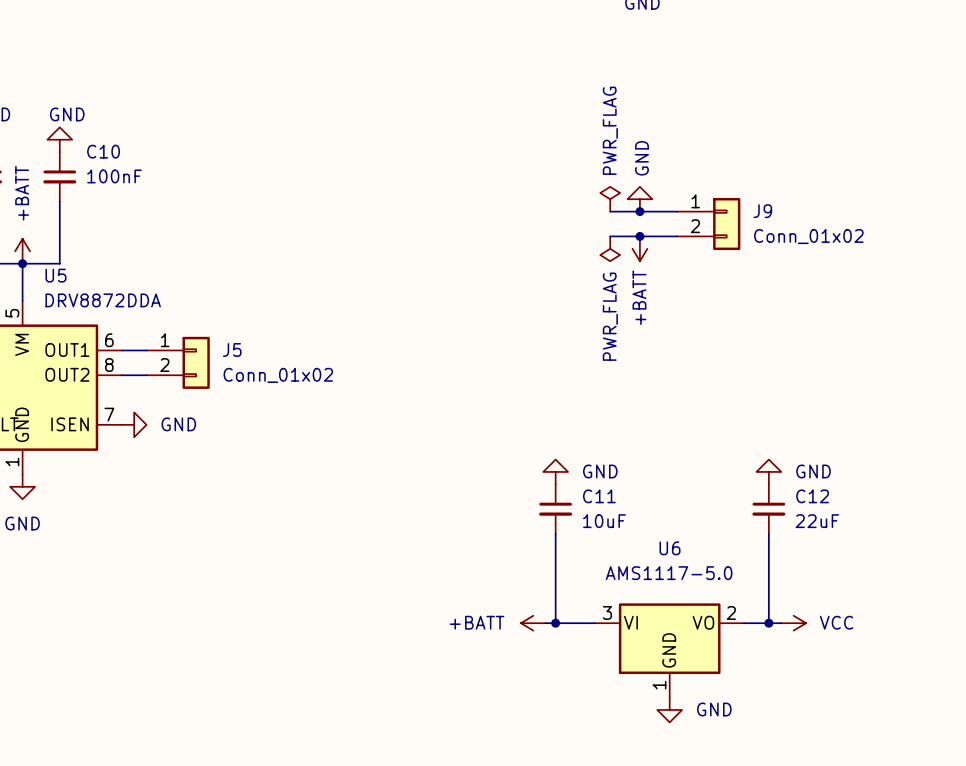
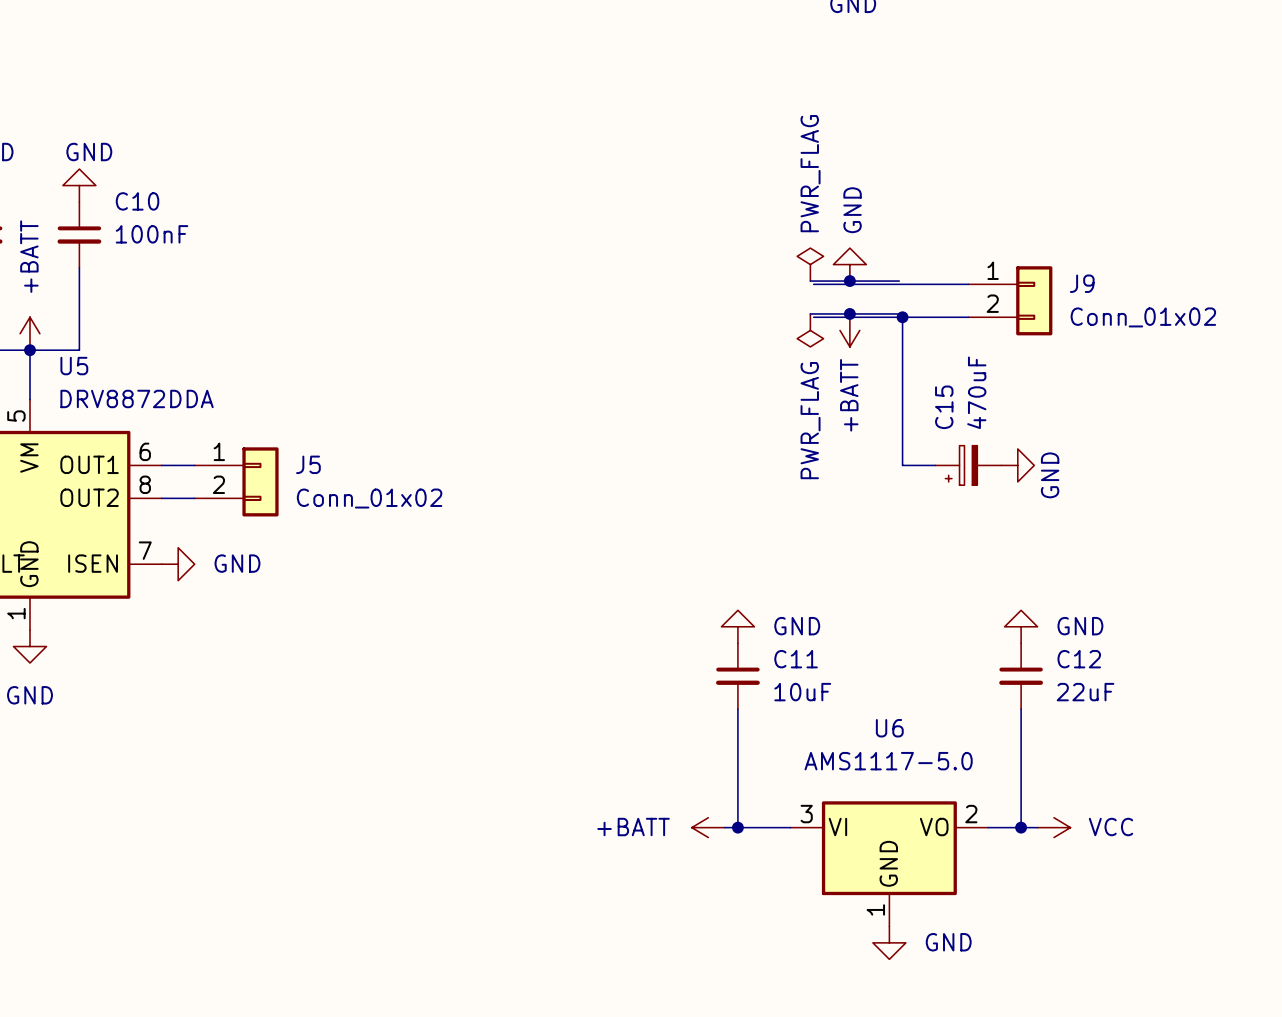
wire: none -> (813, 284) (968, 284)
J9 position: (708, 224) -> (1010, 300)
wire: none -> (813, 317) (968, 317)
wire: none -> (902, 317) (902, 465) (935, 465)
junction: none -> (902, 317)
C15: none -> 470uF (968, 465)
power symbol: none -> GND (1017, 465)

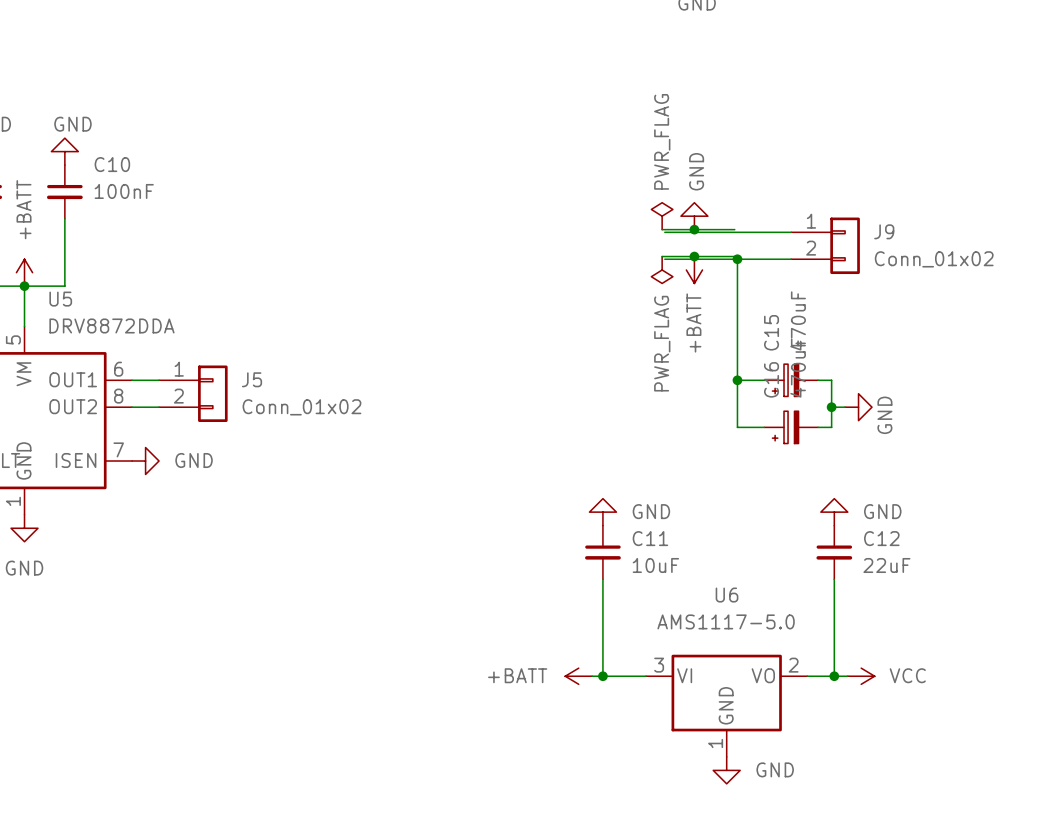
wire: none -> (737, 380) (737, 427) (764, 427)
junction: none -> (737, 380)
wire: none -> (818, 380) (831, 380) (831, 427) (818, 427)
power symbol position: GND (1017, 465) -> GND (858, 407)
wire: none -> (831, 407) (845, 407)
junction: none -> (831, 407)
C16: none -> 470uF (791, 427)

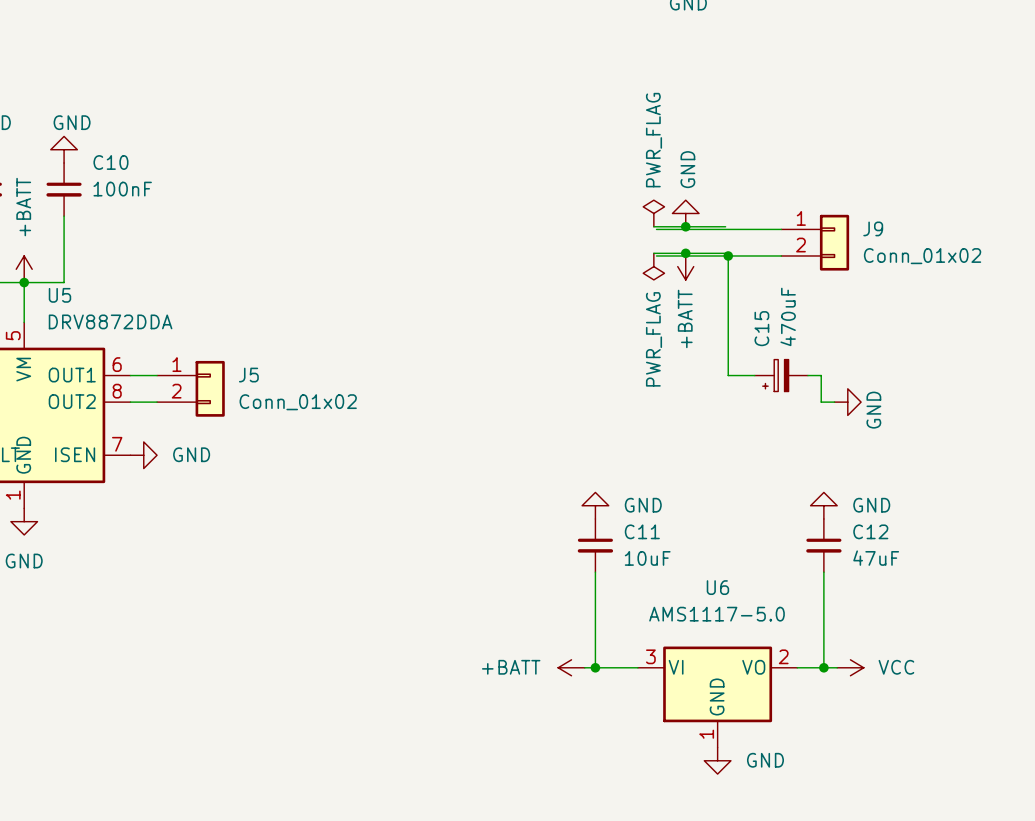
wire: (737, 380) (737, 427) (764, 427) -> none
junction: (737, 380) -> none
wire: (831, 407) (831, 427) (818, 427) -> none
junction: (831, 407) -> none
C16: 470uF (791, 427) -> none
C12 value: 22uF (886, 565) -> 47uF (876, 558)

